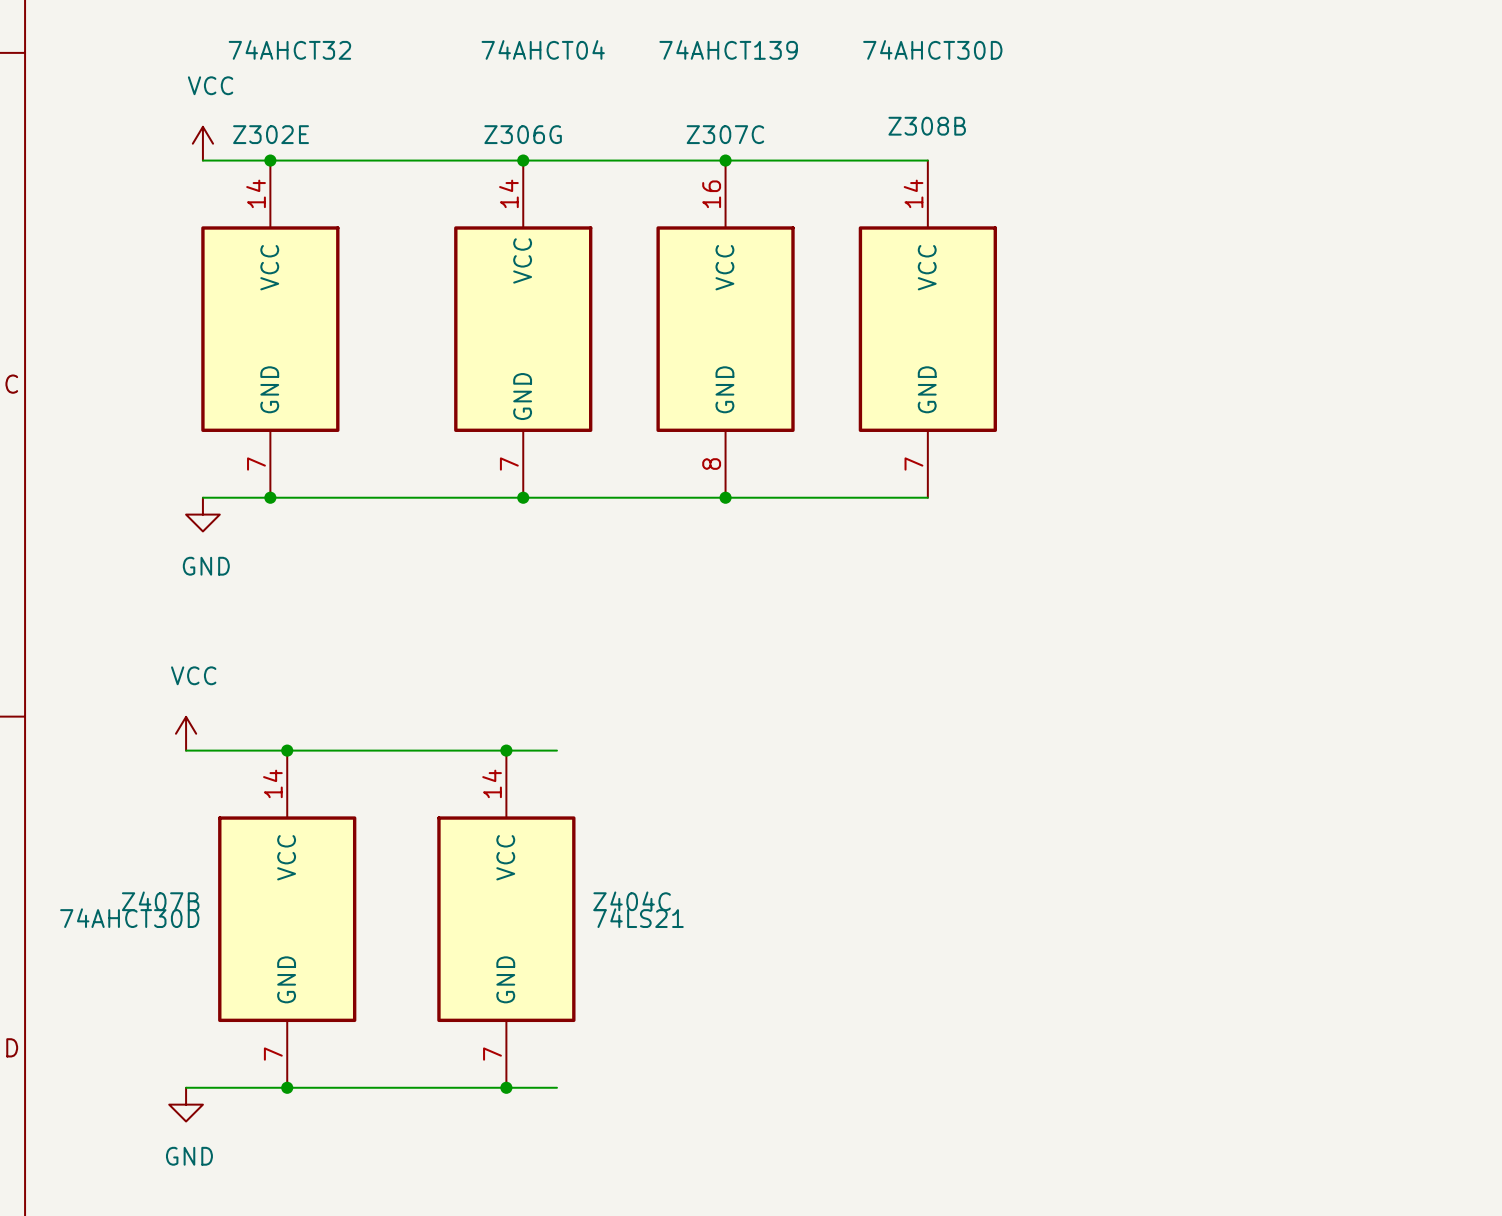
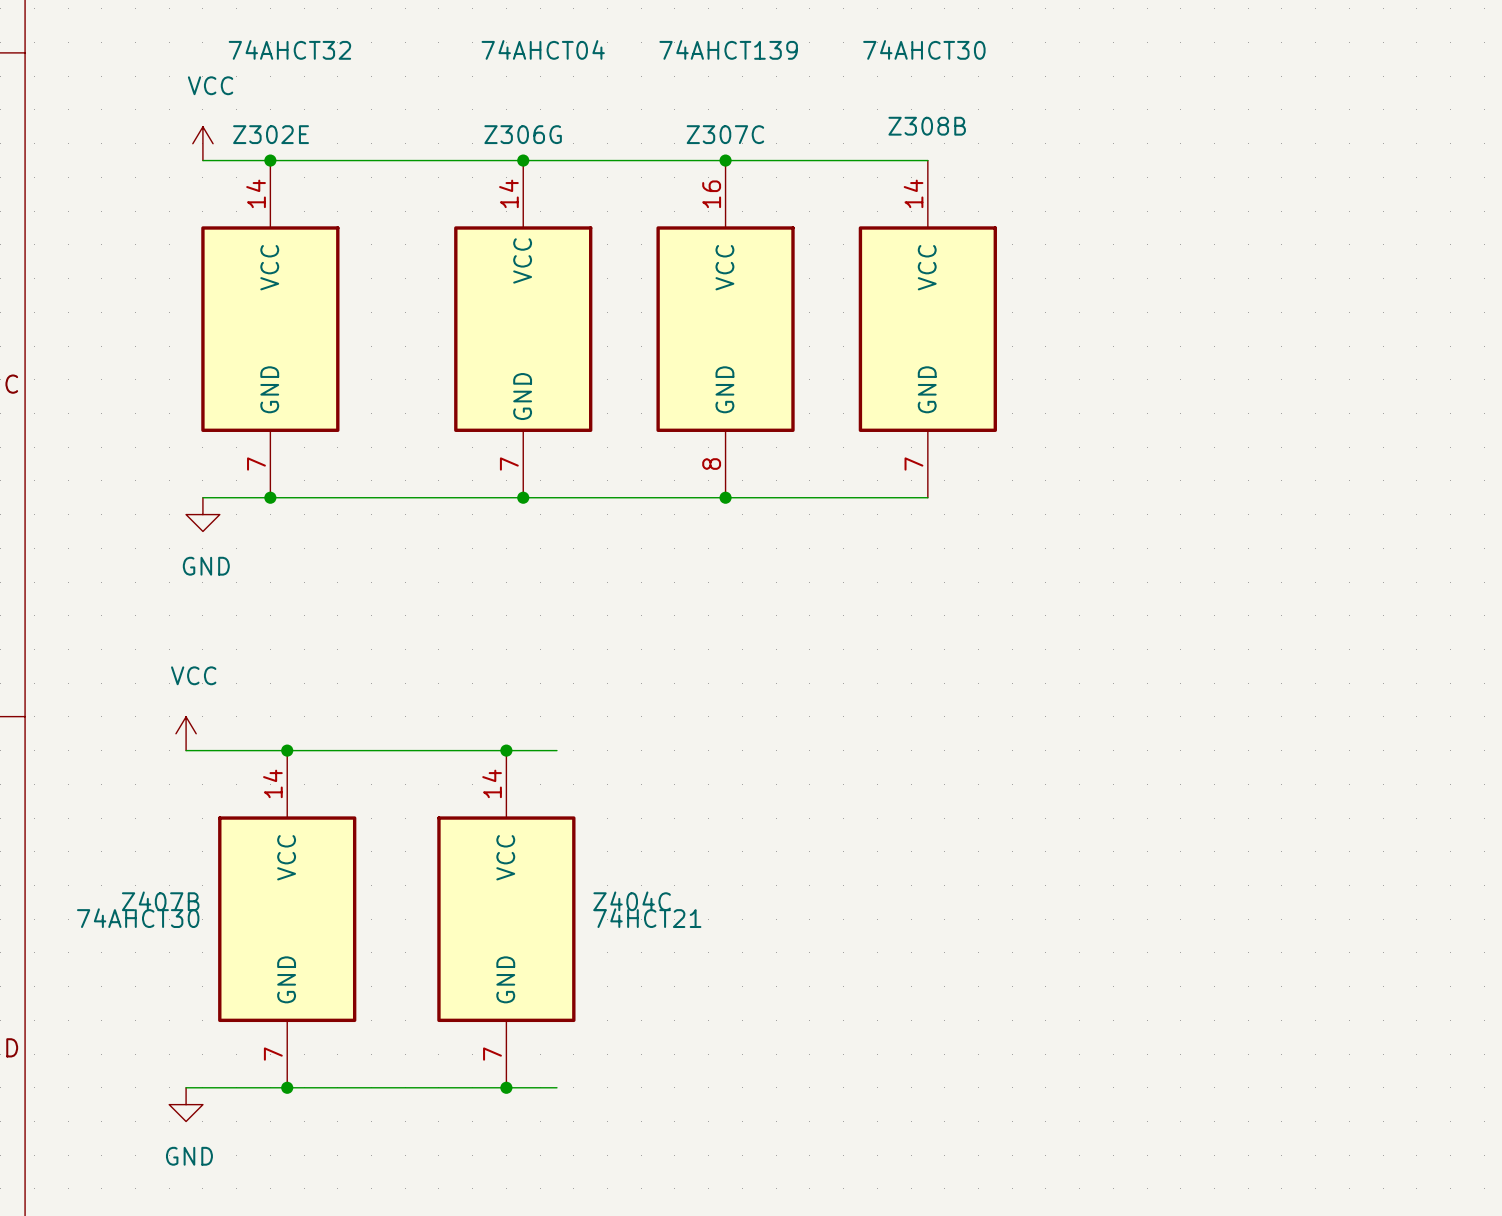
Z308B value: 74AHCT30D (932, 49) -> 74AHCT30 (924, 49)
Z407B value: 74AHCT30D (129, 918) -> 74AHCT30 (138, 918)
Z404C value: 74LS21 (638, 918) -> 74HCT21 (647, 918)

